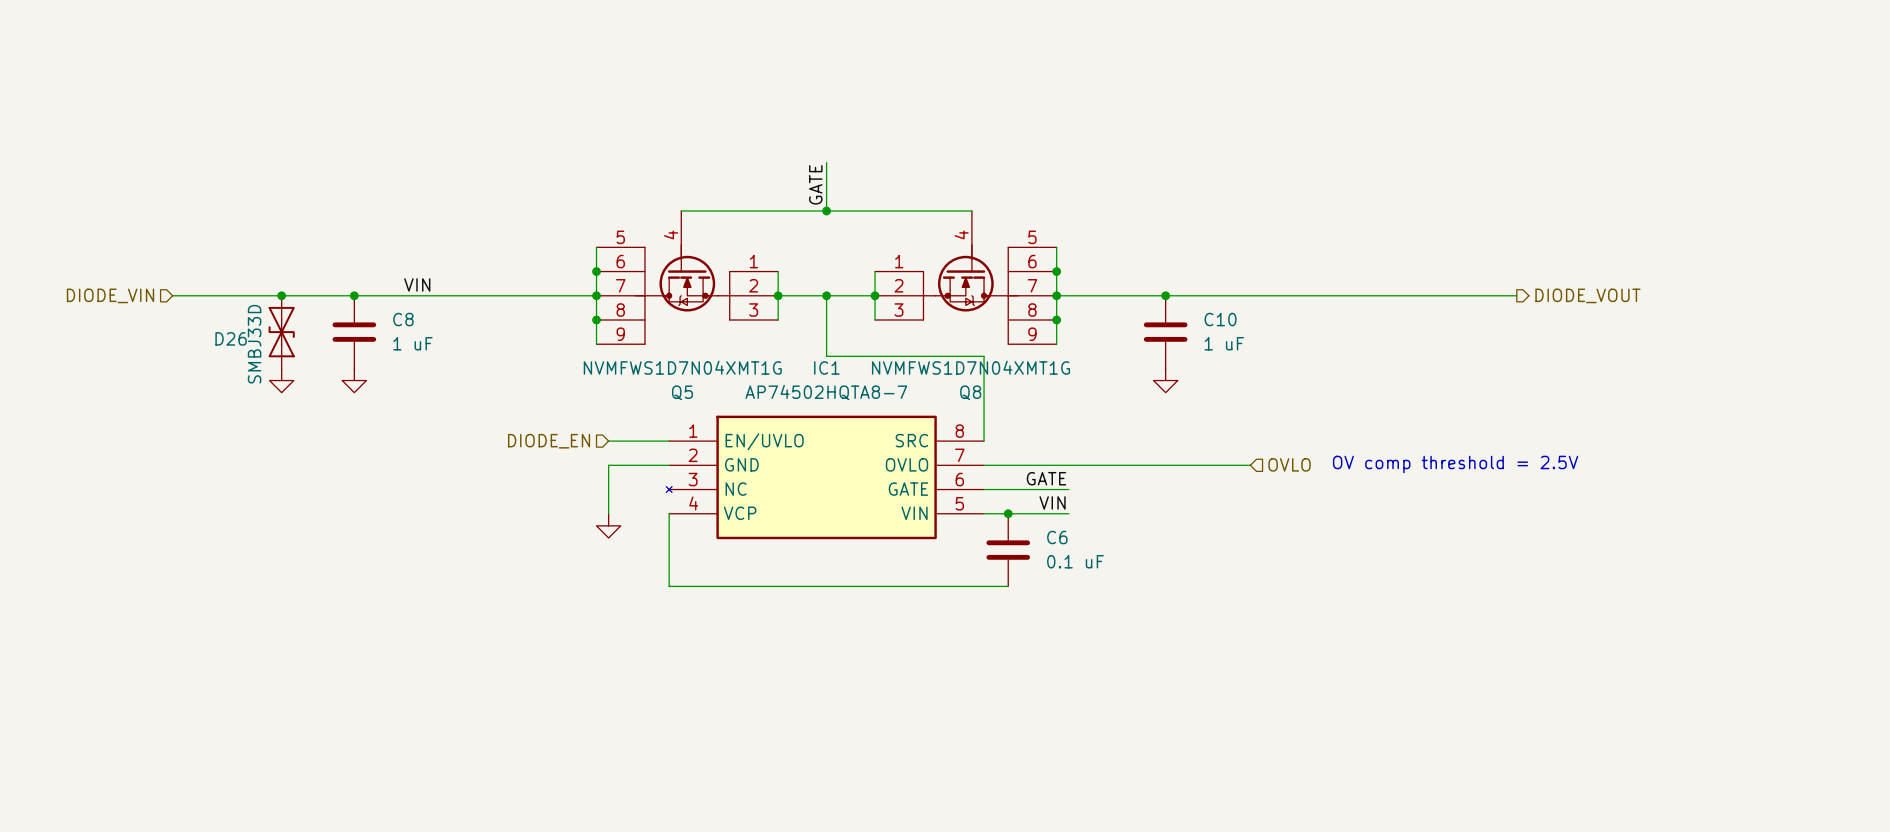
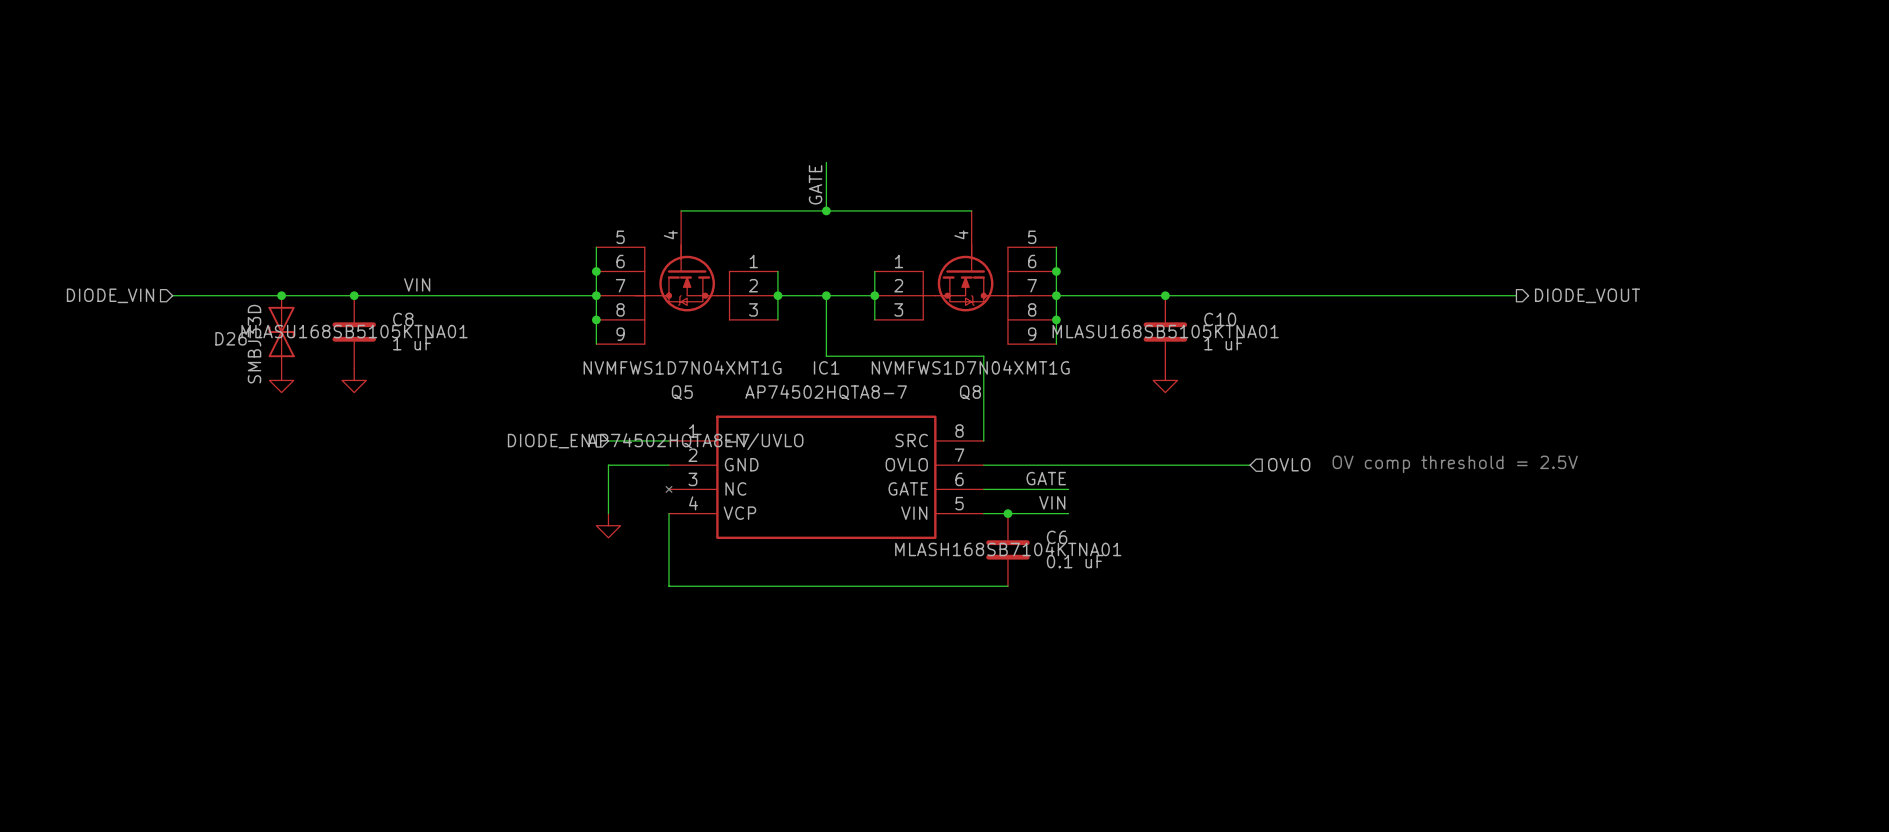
C8 text: none -> MLASU168SB5105KTNA01 (354, 331)
C10 text: none -> MLASU168SB5105KTNA01 (1165, 331)
IC1 text: none -> AP74502HQTA8-7 (668, 440)
C6 text: none -> MLASH168SB7104KTNA01 (1008, 549)

